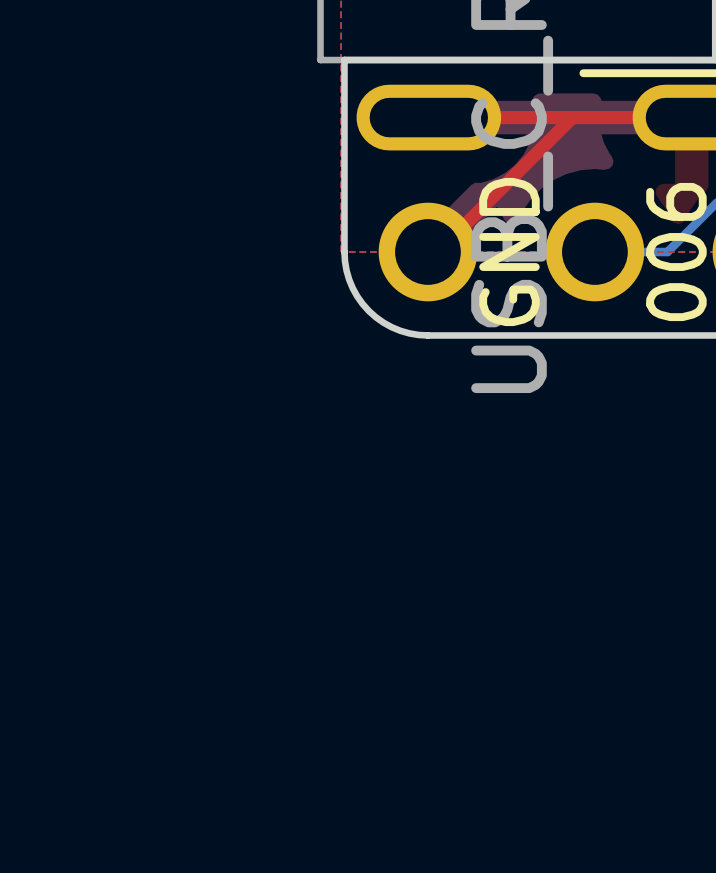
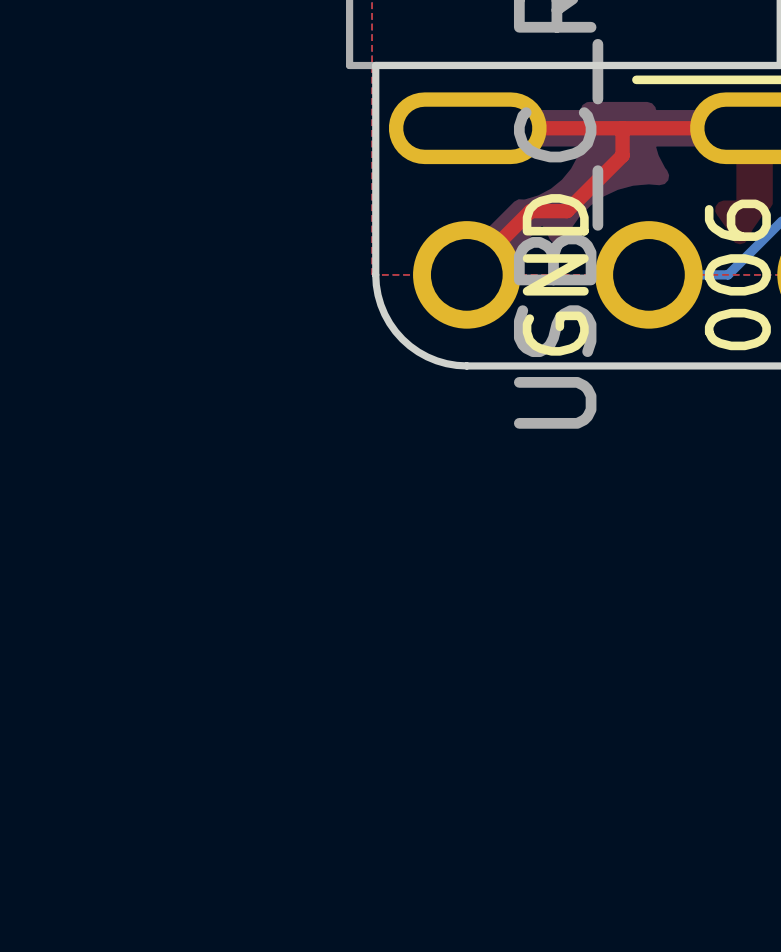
top track: (570, 119) (437, 252) (427, 252) -> (622, 130) (622, 155) (566, 211) (530, 211) (466, 274)

